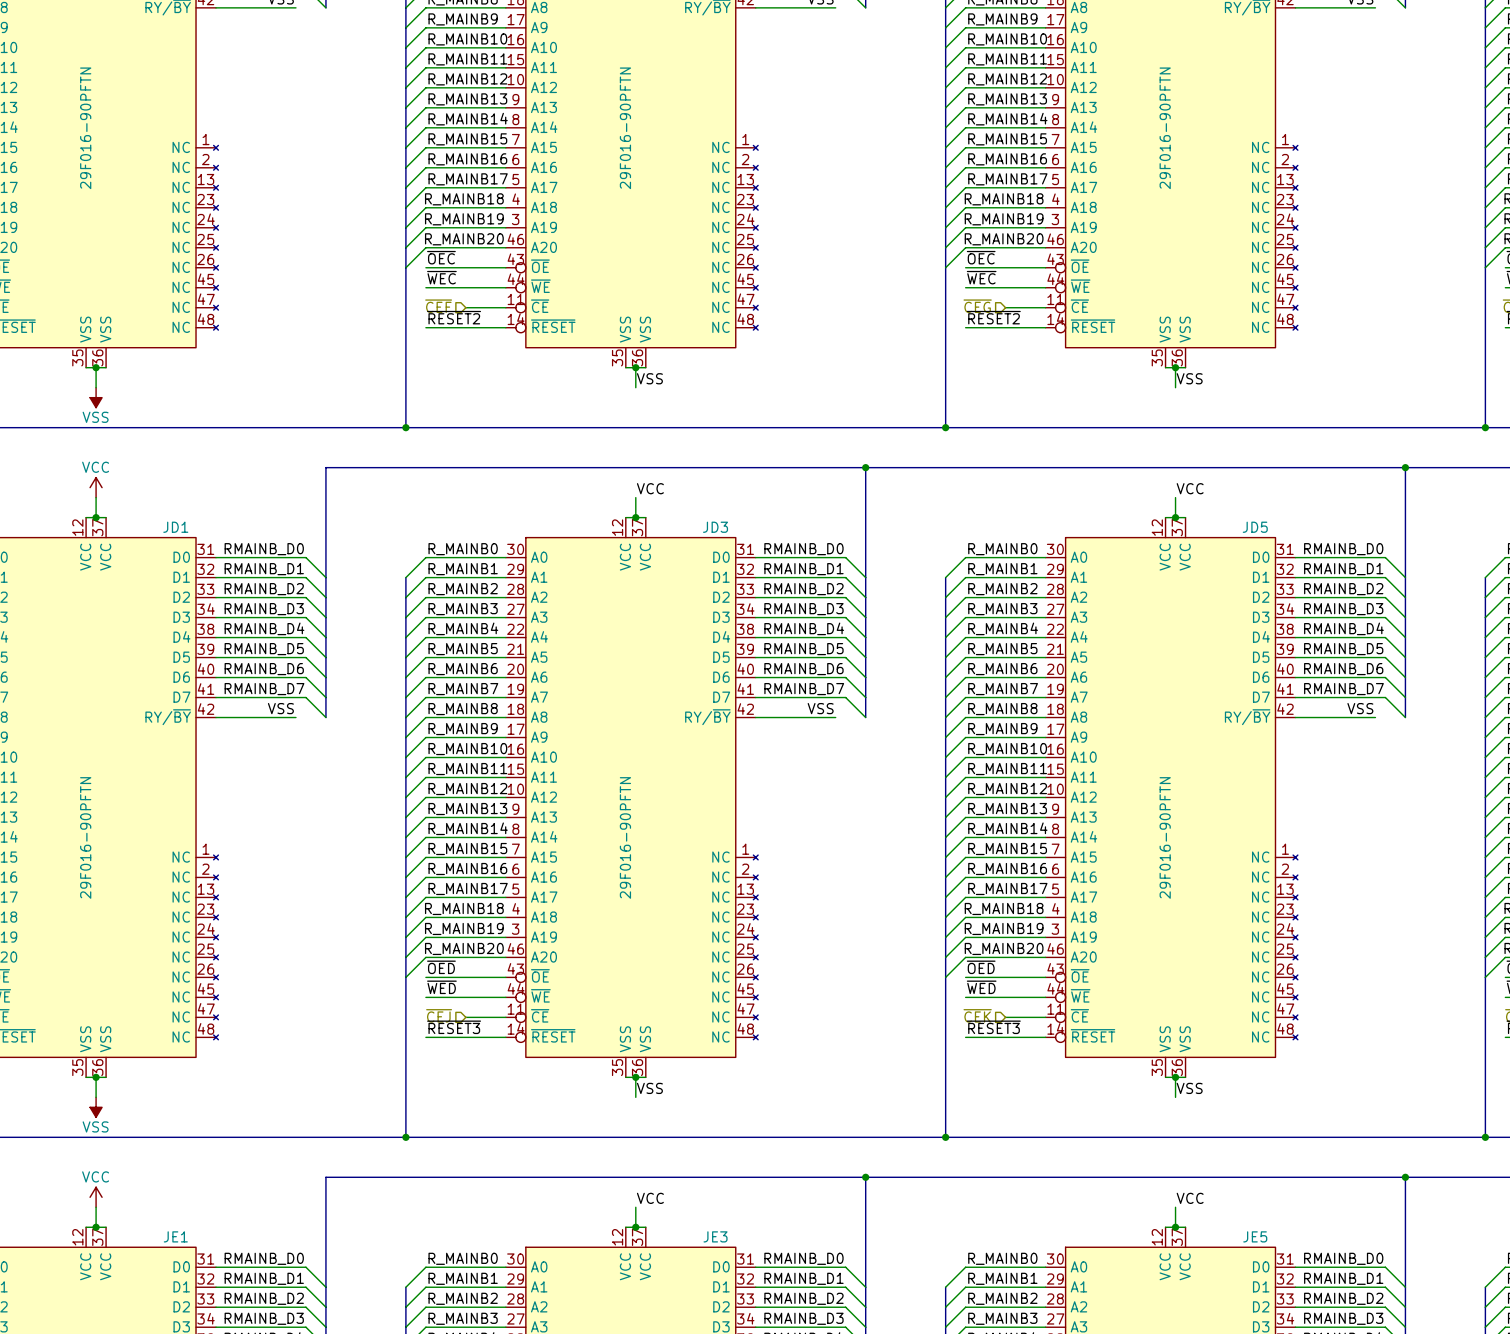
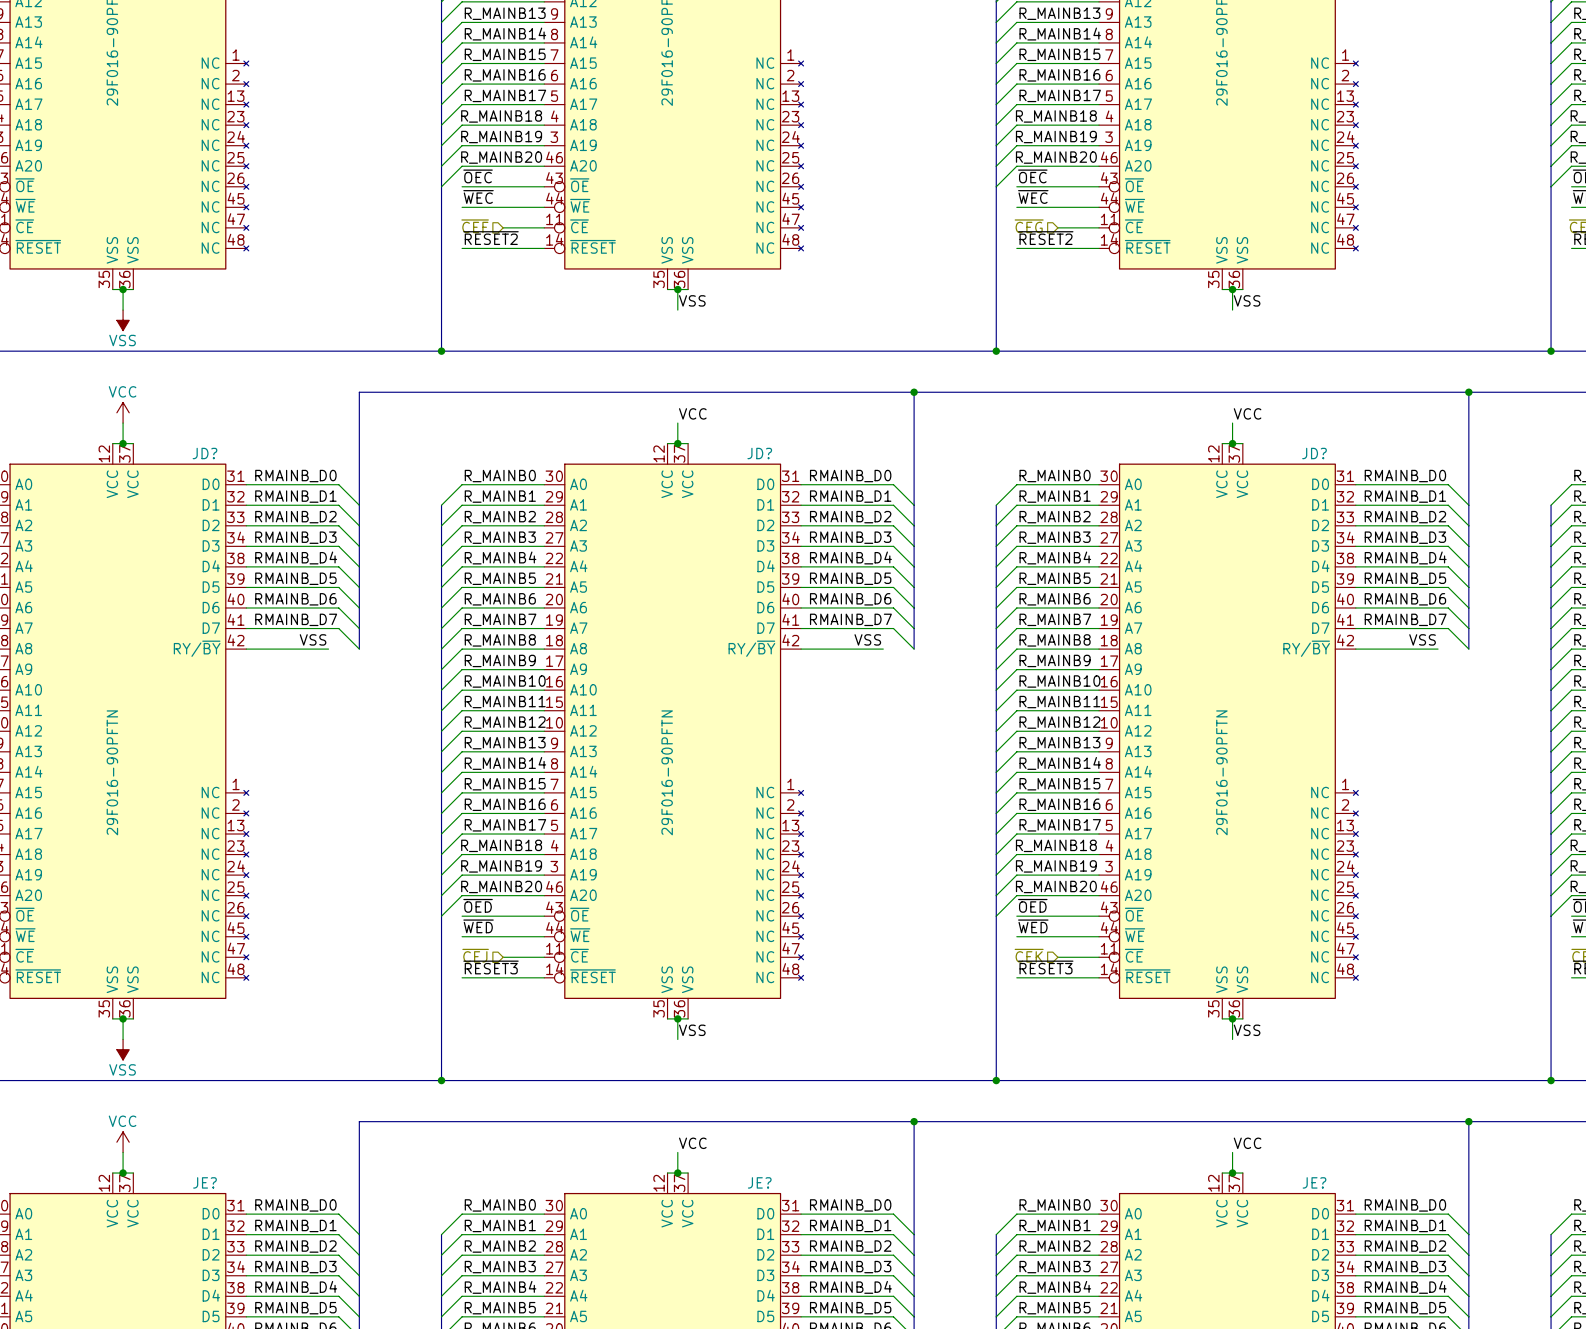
JD1 name: JD1 (175, 527) -> JD? (204, 453)
JD3 name: JD3 (715, 527) -> JD? (759, 453)
JD5 name: JD5 (1255, 527) -> JD? (1314, 453)
JE1 name: JE1 (175, 1236) -> JE? (204, 1182)
JE3 name: JE3 (715, 1236) -> JE? (759, 1182)
JE5 name: JE5 (1255, 1236) -> JE? (1314, 1182)

